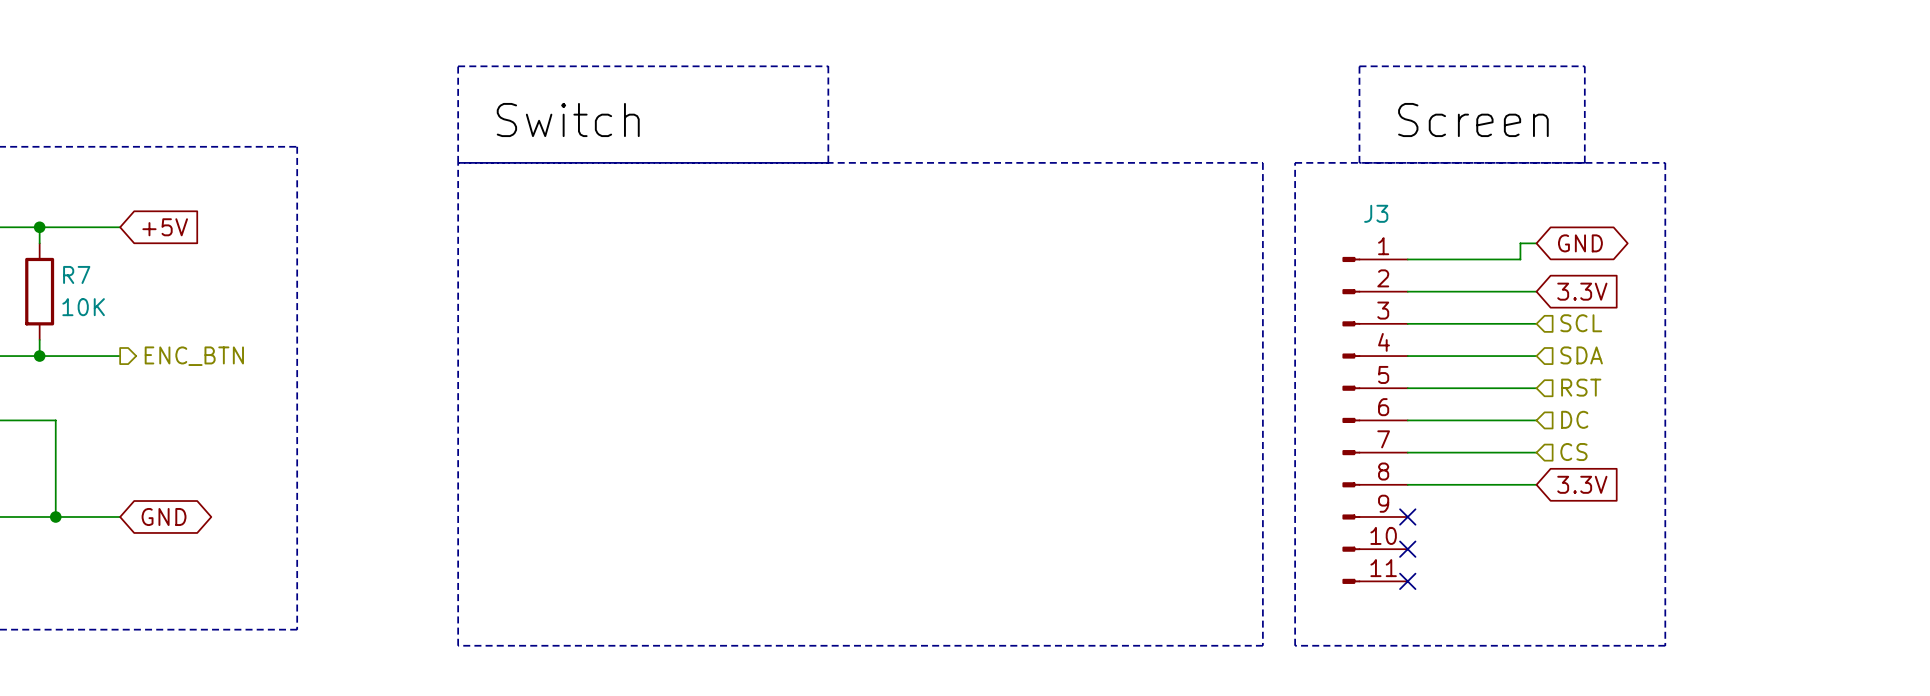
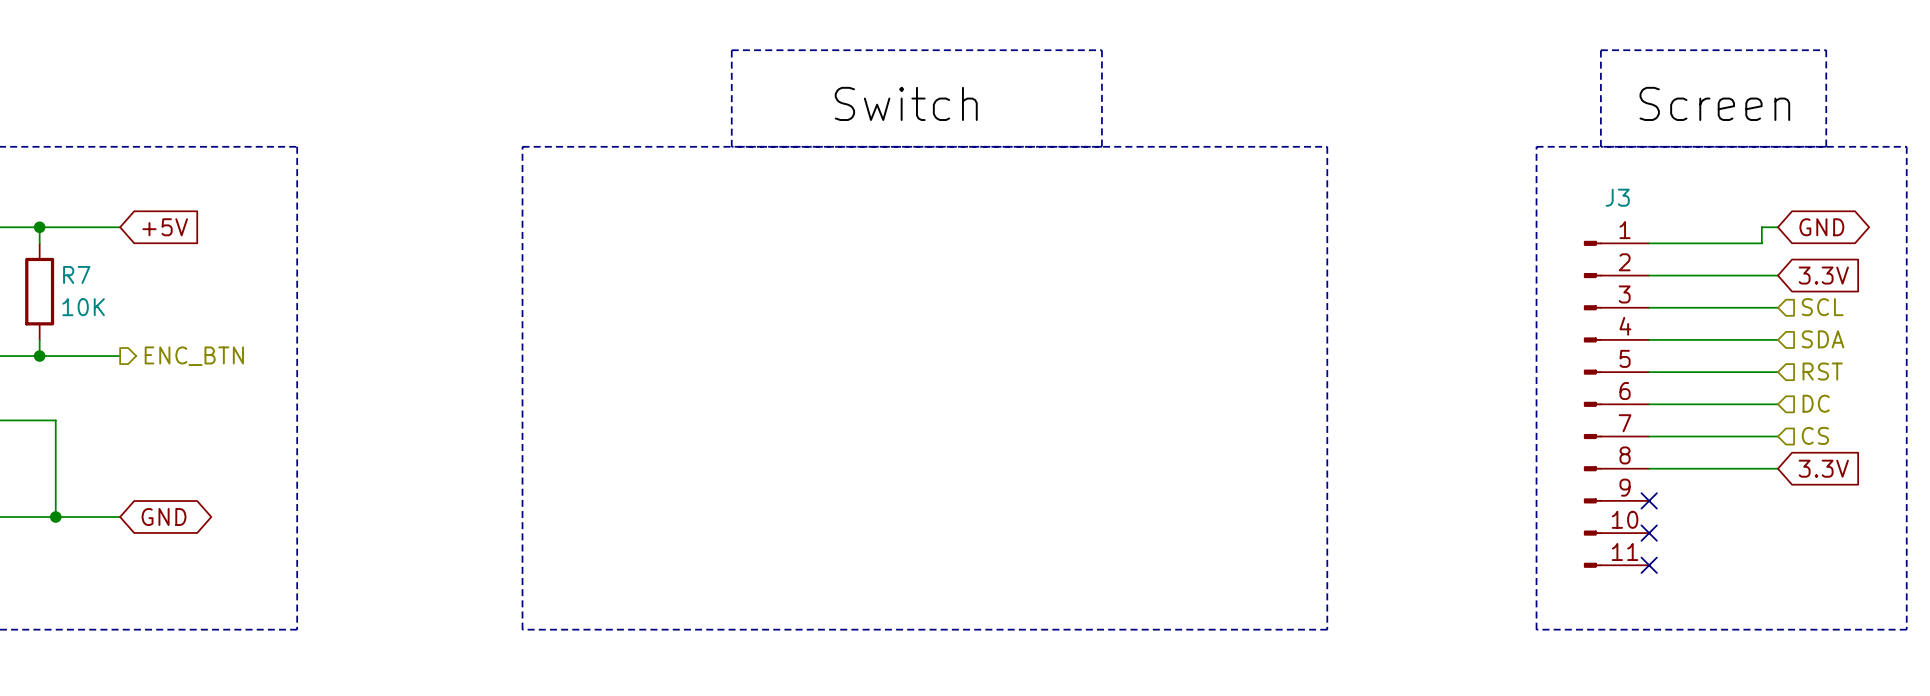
label: none -> Switch (906, 103)
label: Switch (568, 120) -> none
label position: Screen (1473, 120) -> Screen (1714, 103)
line: none -> (522, 146) (1327, 146) (1327, 629) (522, 629) (522, 146)
line: none -> (731, 146) (731, 50) (1101, 50) (1101, 146)
line: (458, 162) (1262, 162) (1262, 645) (458, 645) (458, 66) (828, 66) (828, 162) -> none
line: (1295, 162) (1665, 162) (1665, 645) (1295, 645) (1295, 162) -> (1536, 146) (1906, 146) (1906, 629) (1536, 629) (1536, 146)
line: (1359, 162) (1359, 66) (1584, 66) (1584, 162) -> (1600, 146) (1600, 50) (1826, 50) (1826, 146)
wire: (1536, 243) (1520, 243) (1520, 259) (1407, 259) -> (1777, 227) (1761, 227) (1761, 243) (1649, 243)
global label position: GND (1580, 243) -> GND (1821, 227)
global label: none -> 3.3V (1823, 275)
wire: (1407, 291) (1536, 291) -> (1649, 275) (1777, 275)
global label: 3.3V (1582, 291) -> none
wire: (1407, 323) (1536, 323) -> (1649, 307) (1777, 307)
hierarchical label position: SCL (1581, 323) -> SCL (1822, 307)
hierarchical label position: SDA (1581, 355) -> SDA (1823, 339)
wire: (1407, 356) (1536, 356) -> (1649, 339) (1777, 339)
hierarchical label position: RST (1581, 387) -> RST (1822, 371)
wire: (1407, 388) (1536, 388) -> (1649, 372) (1777, 372)
hierarchical label position: DC (1574, 419) -> DC (1816, 403)
J3 position: (1375, 420) -> (1616, 404)
wire: (1407, 420) (1536, 420) -> (1649, 404) (1777, 404)
wire: (1407, 452) (1536, 452) -> (1649, 436) (1777, 436)
hierarchical label position: CS (1573, 452) -> CS (1815, 435)
global label: none -> 3.3V (1823, 468)
wire: (1407, 484) (1536, 484) -> (1649, 468) (1777, 468)
global label: 3.3V (1582, 484) -> none
no-connect mark: none -> (1649, 500)
no-connect mark: (1407, 516) -> none
no-connect mark: none -> (1649, 533)
no-connect mark: (1407, 549) -> none
no-connect mark: none -> (1649, 565)
no-connect mark: (1407, 581) -> none

